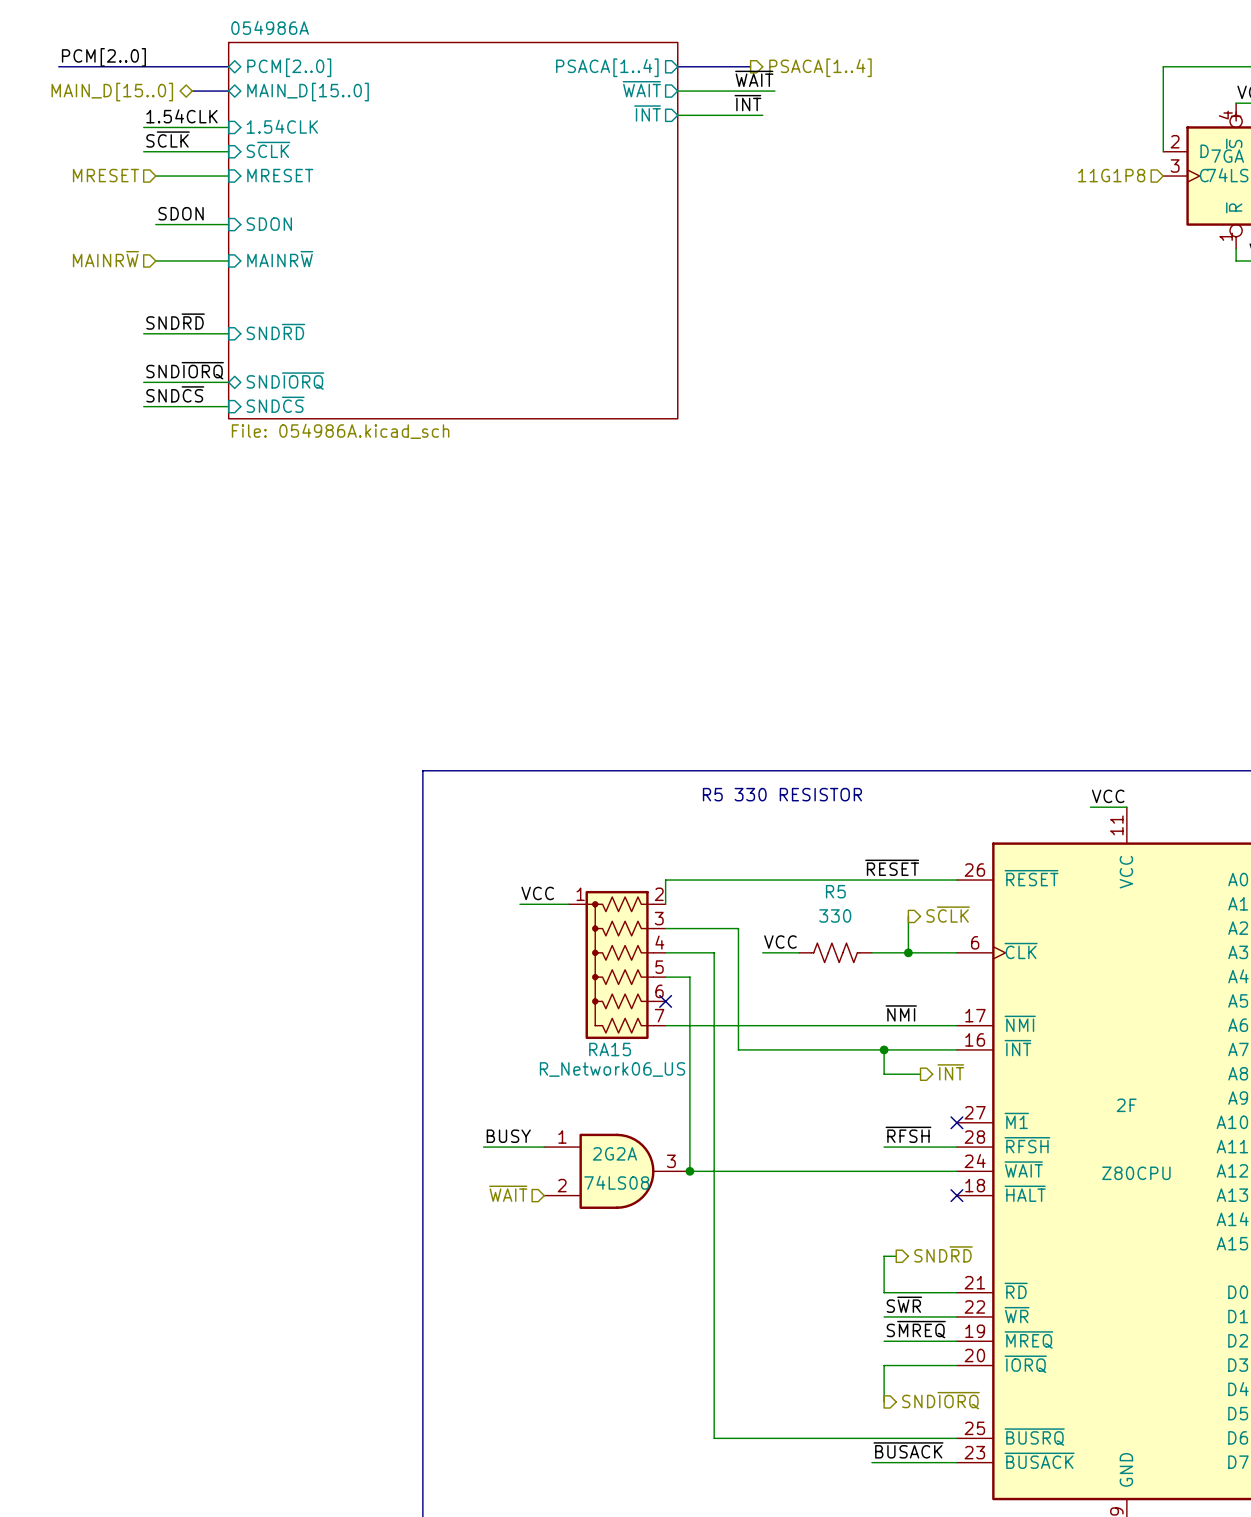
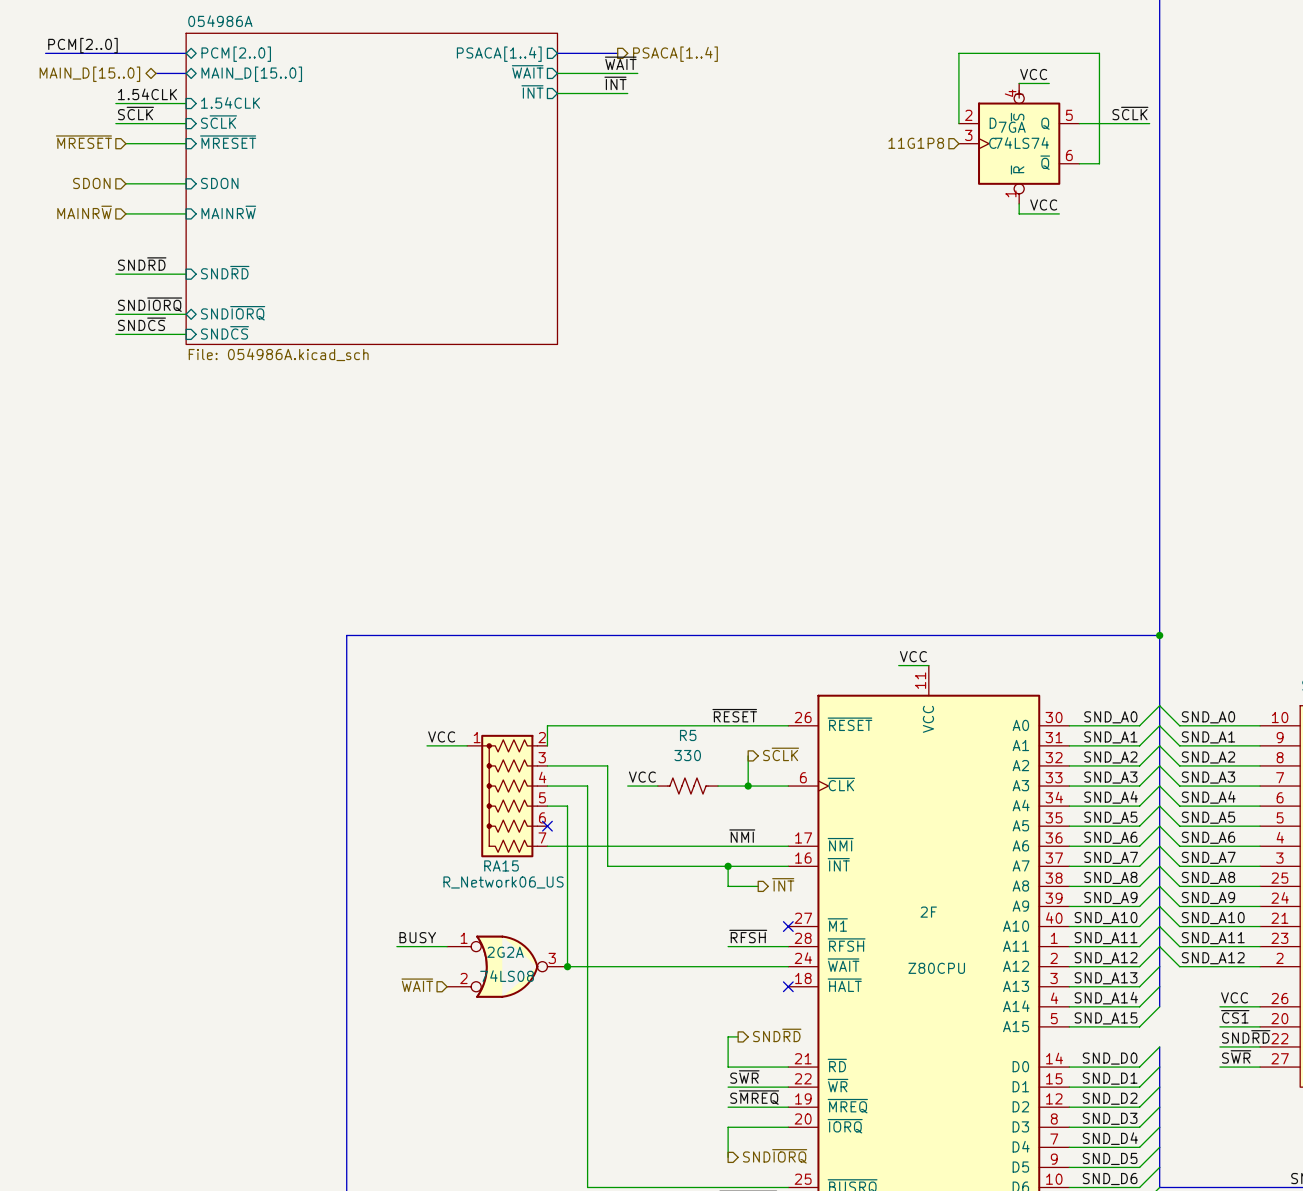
hierarchical label: MRESET (105, 175) -> ~{MRESET} (83, 142)
sheet pin: MRESET (280, 175) -> ~{MRESET} (228, 142)
label: SDON (181, 213) -> none
hierarchical label: none -> SDON (91, 183)
text: R5 330 RESISTOR (782, 794) -> none
2G2A symbol: [544, 1133, 690, 1209] -> [447, 935, 568, 998]

